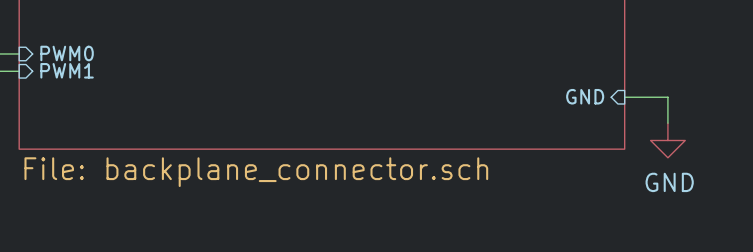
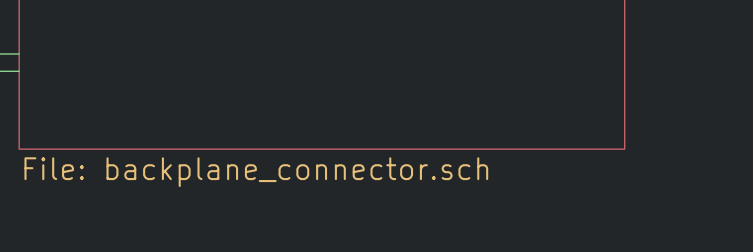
sheet pin: PWM0 (67, 53) -> none
sheet pin: PWM1 (67, 70) -> none
sheet pin: GND (585, 96) -> none
wire: (624, 97) (667, 97) (667, 123) -> none
power symbol: GND (667, 140) -> none

